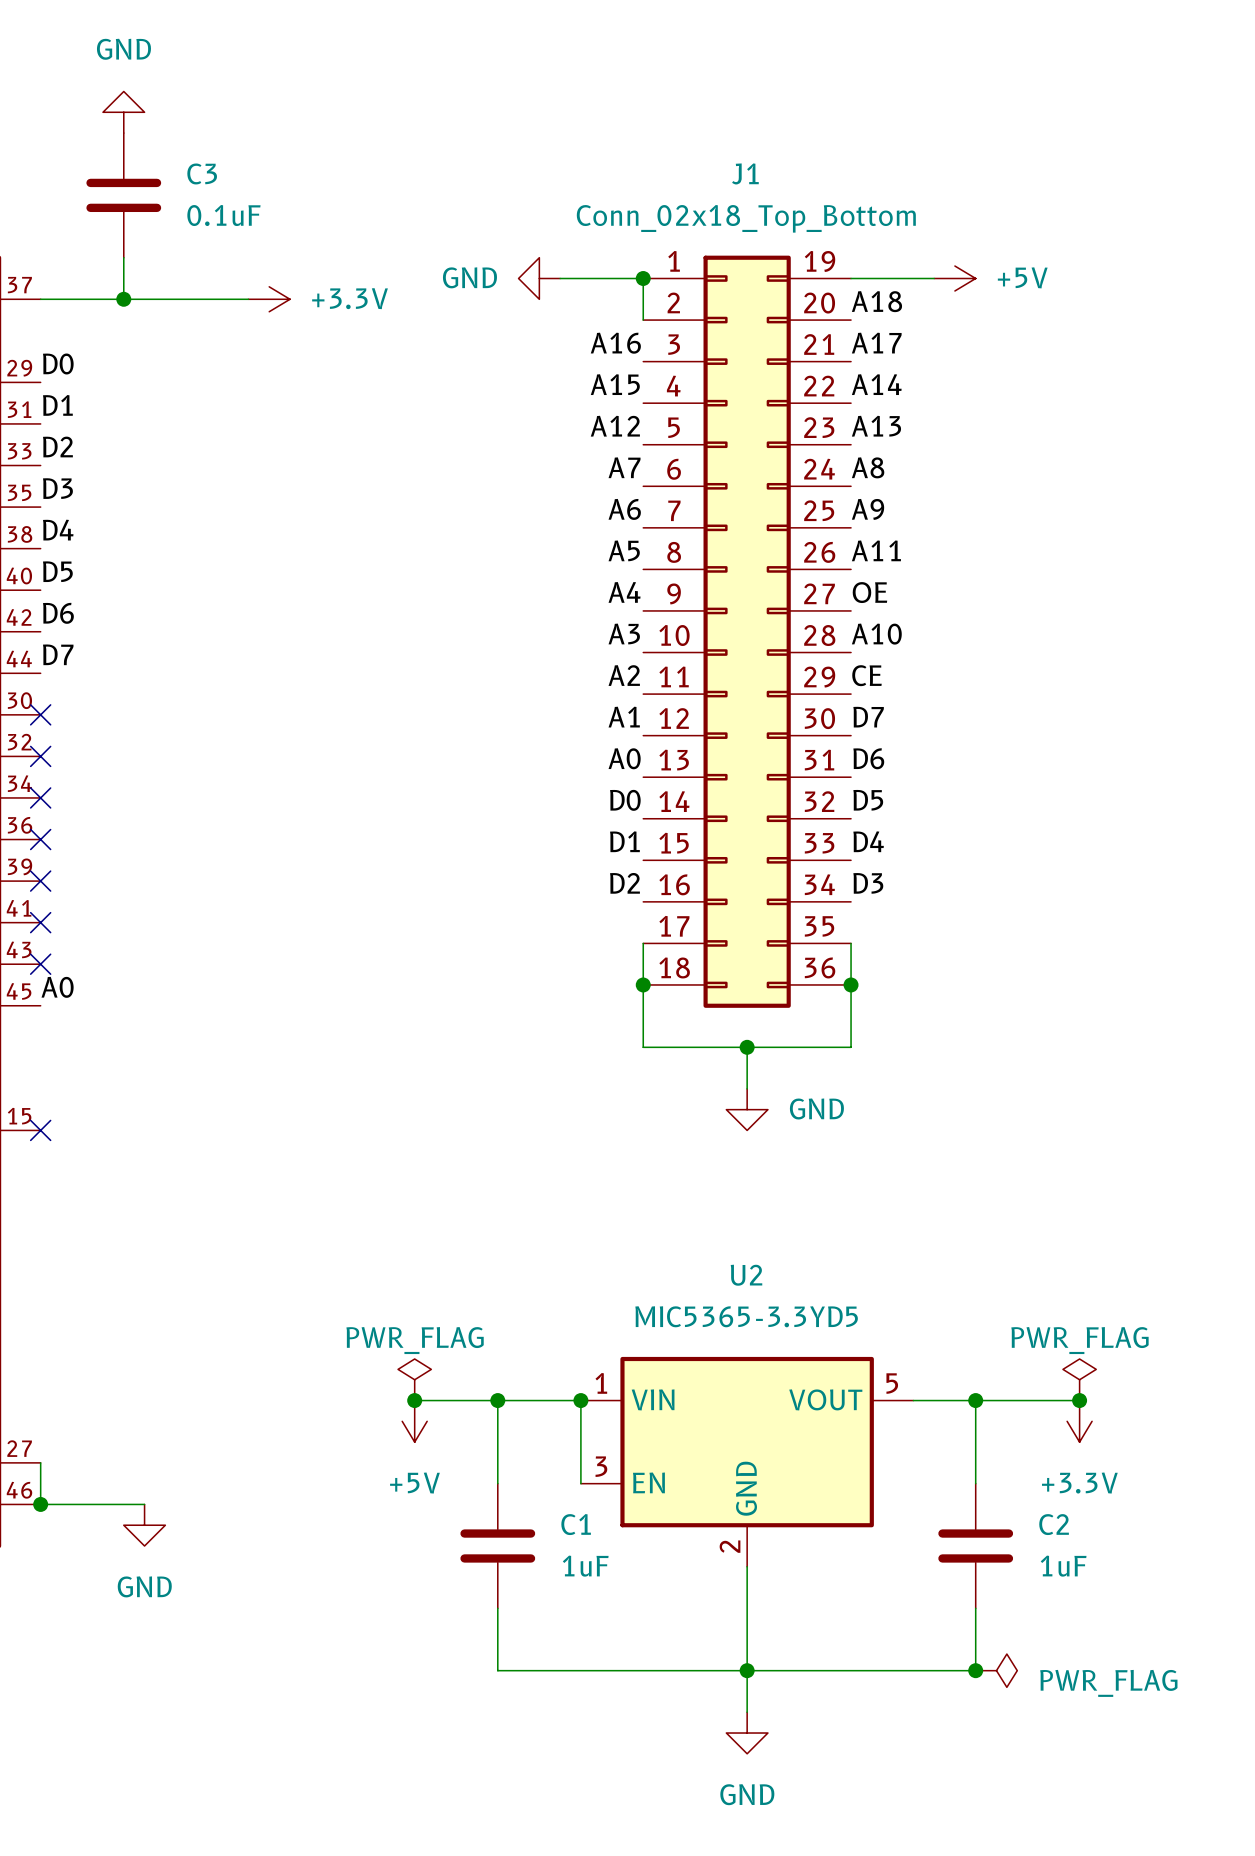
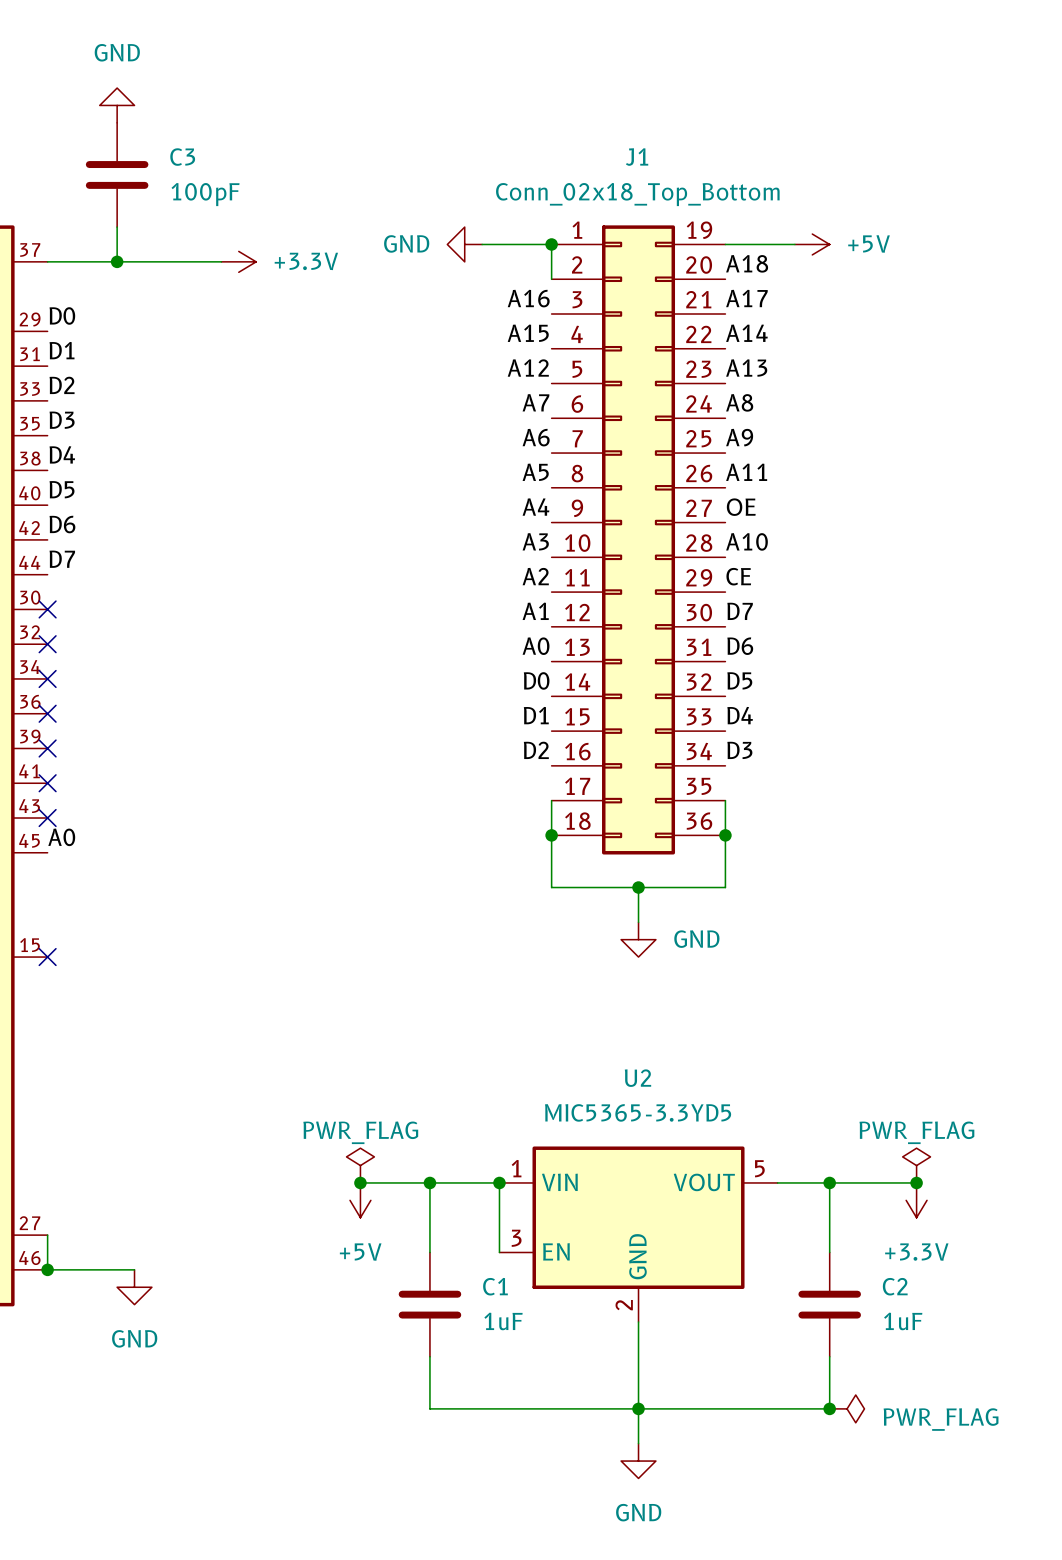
C3 value: 0.1uF (223, 215) -> 100pF (205, 194)

